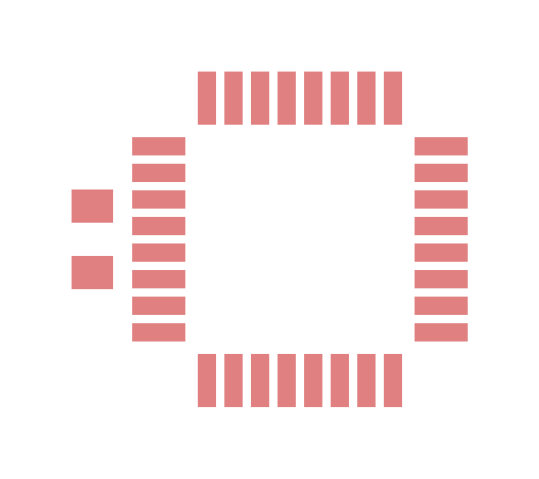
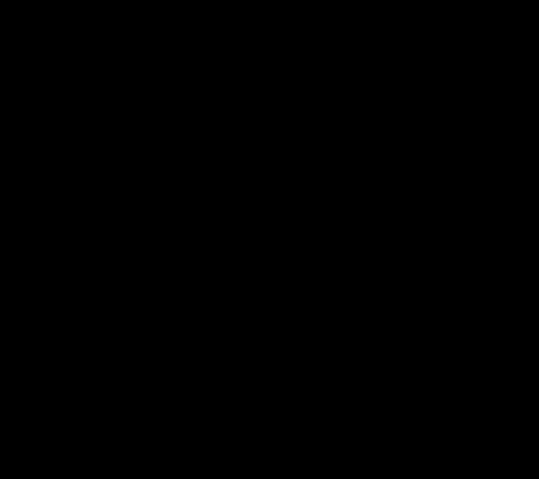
part: (92, 239) -> none
part: (299, 239) -> none

